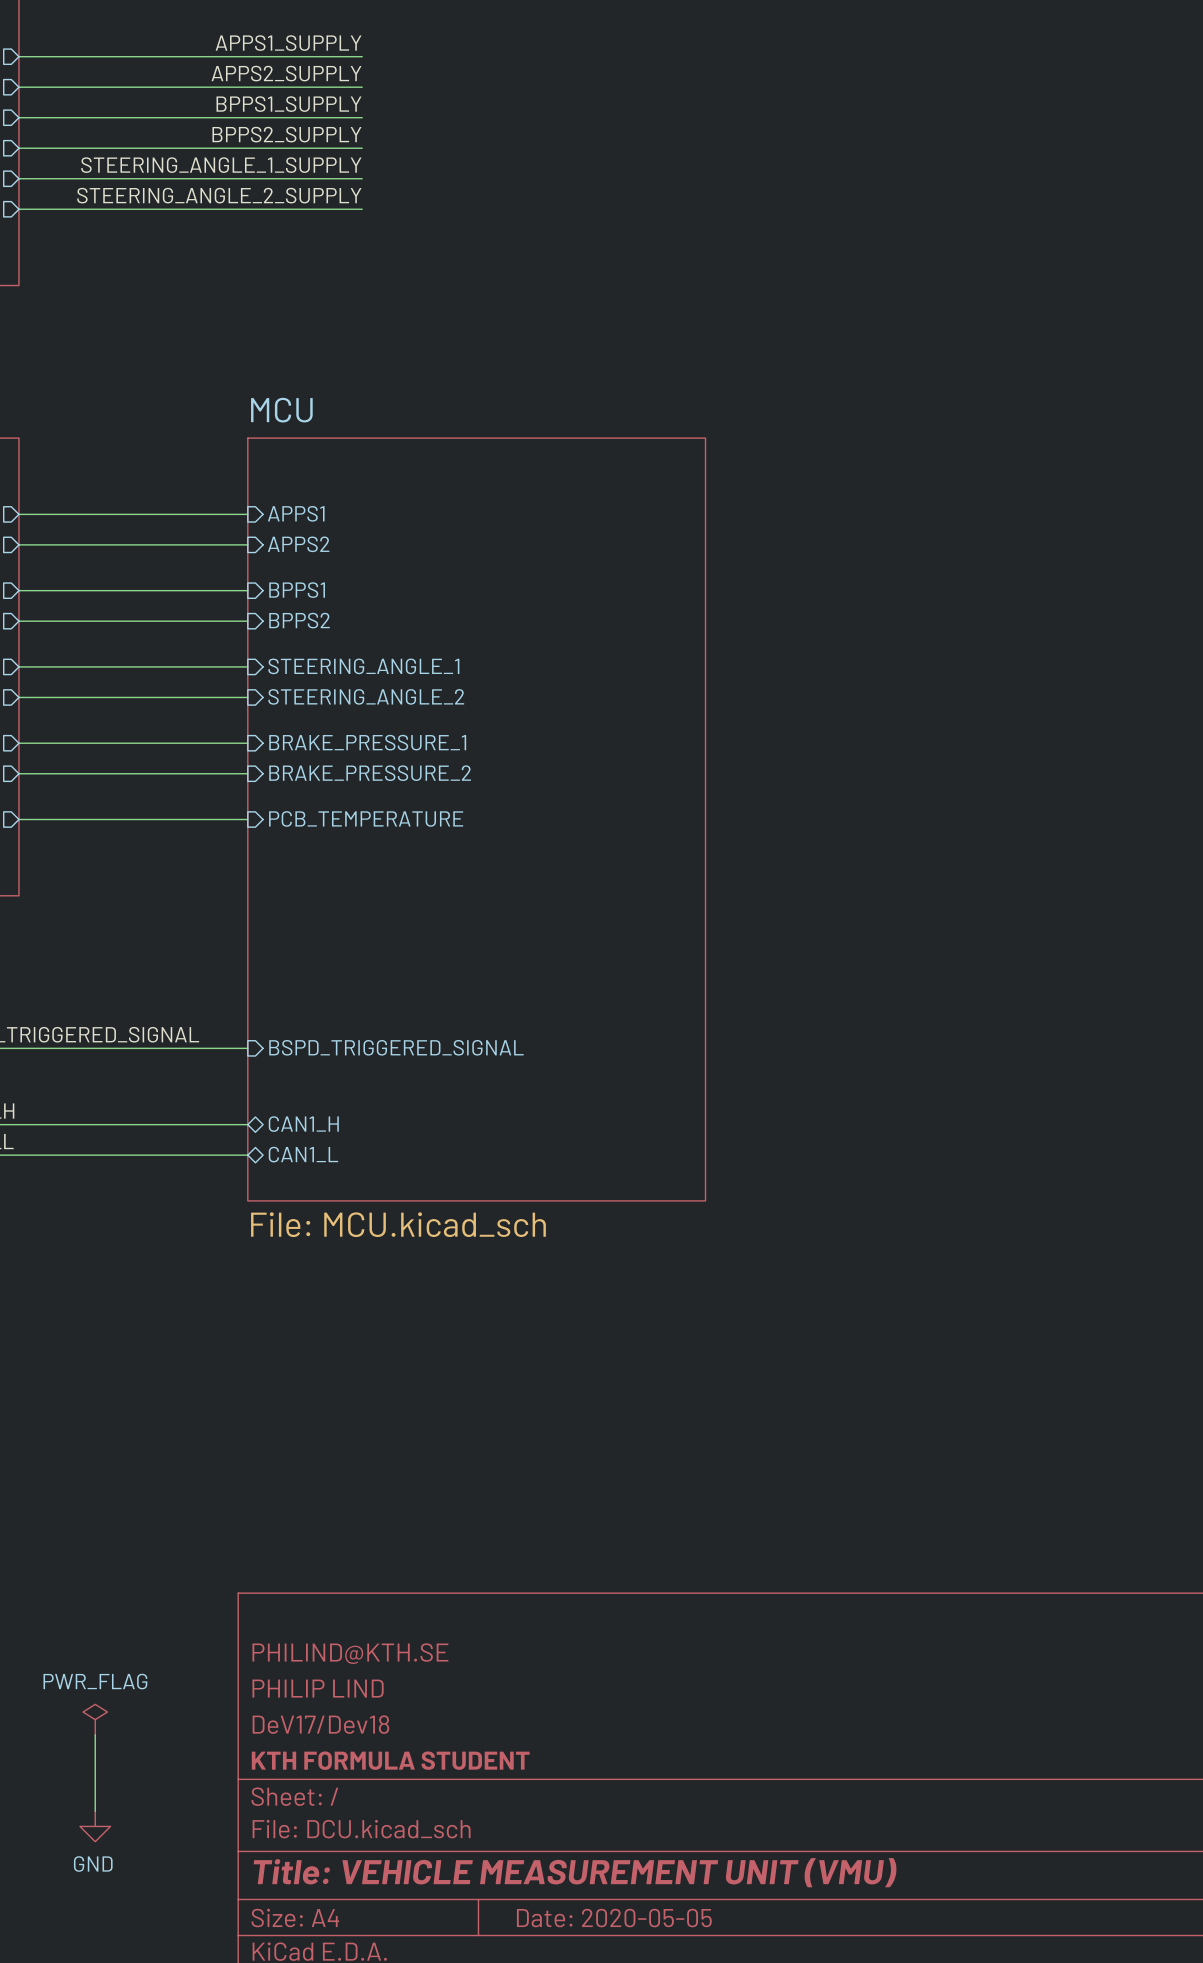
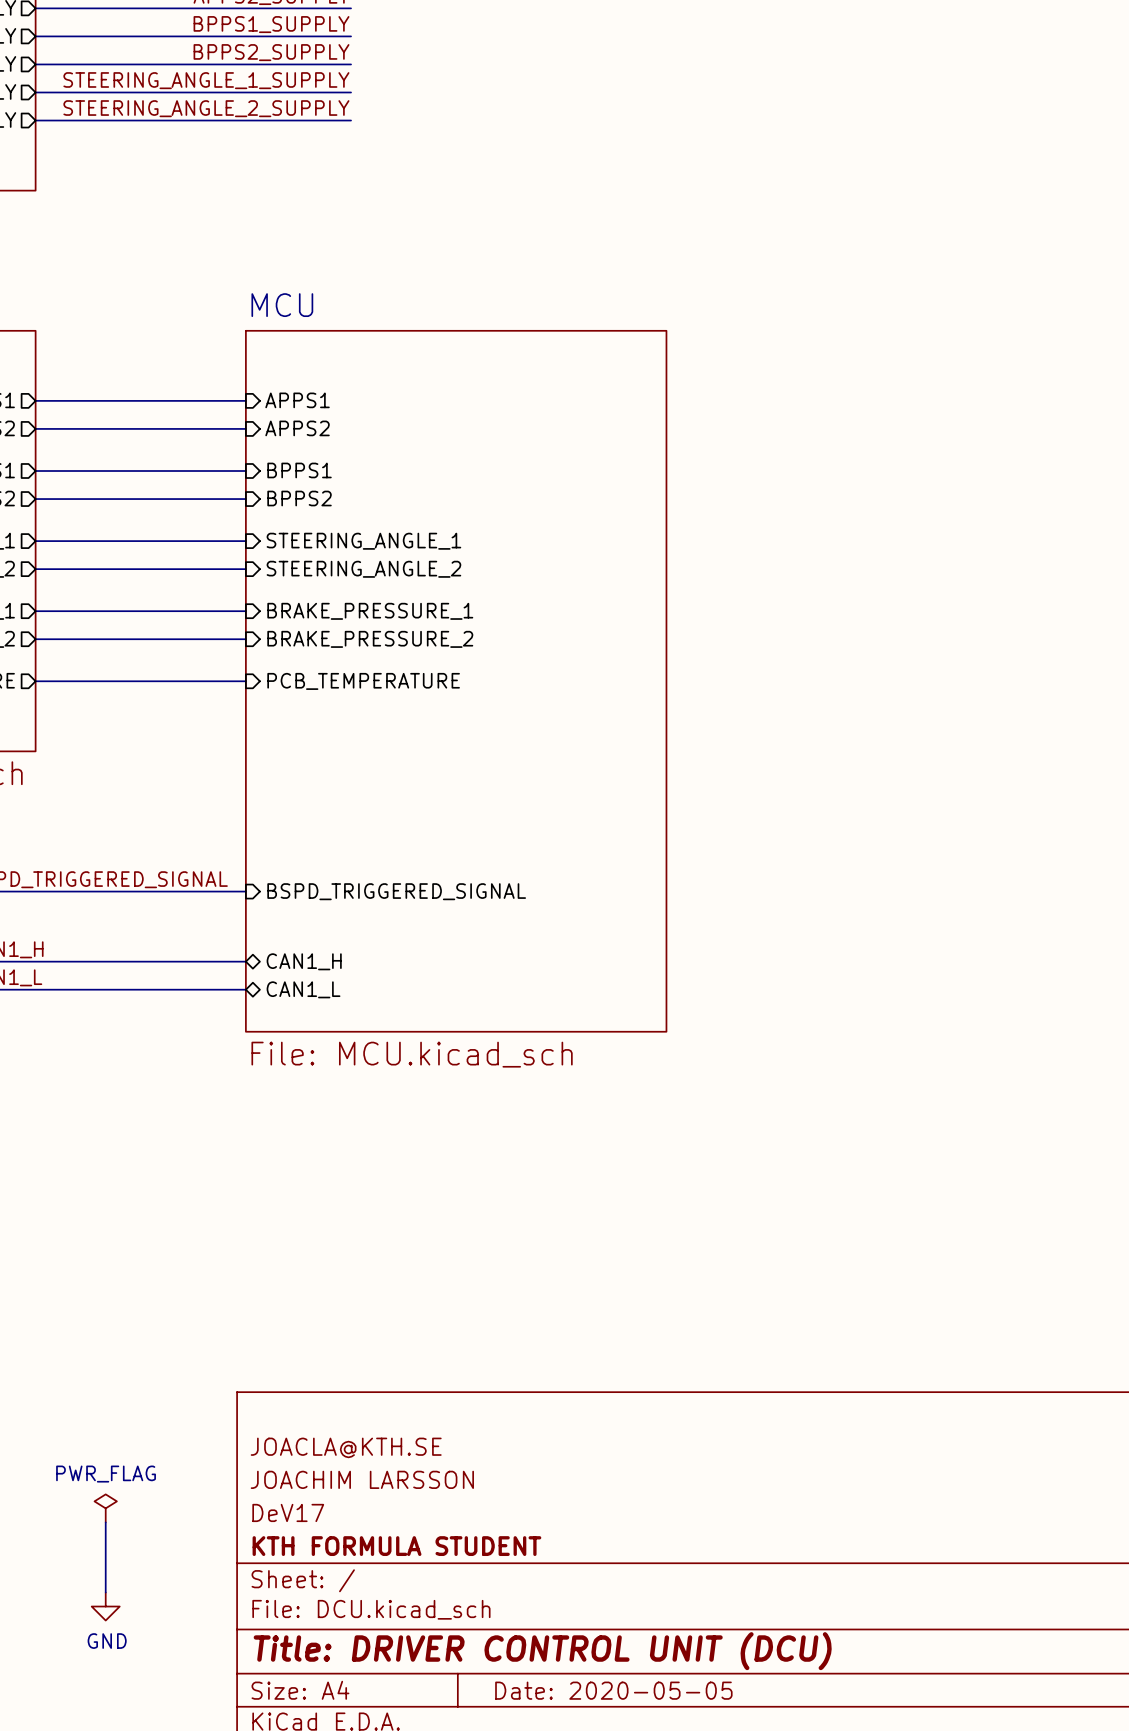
title block: PHILIND@KTH.SE (350, 1653) -> JOACLA@KTH.SE (346, 1447)
title block: PHILIP LIND (318, 1688) -> JOACHIM LARSSON (362, 1479)
title block: DeV17/Dev18 (320, 1724) -> DeV17 (288, 1512)
title block: Title: VEHICLE MEASUREMENT UNIT (VMU) (575, 1872) -> Title: DRIVER CONTROL UNIT (DCU) (542, 1651)

